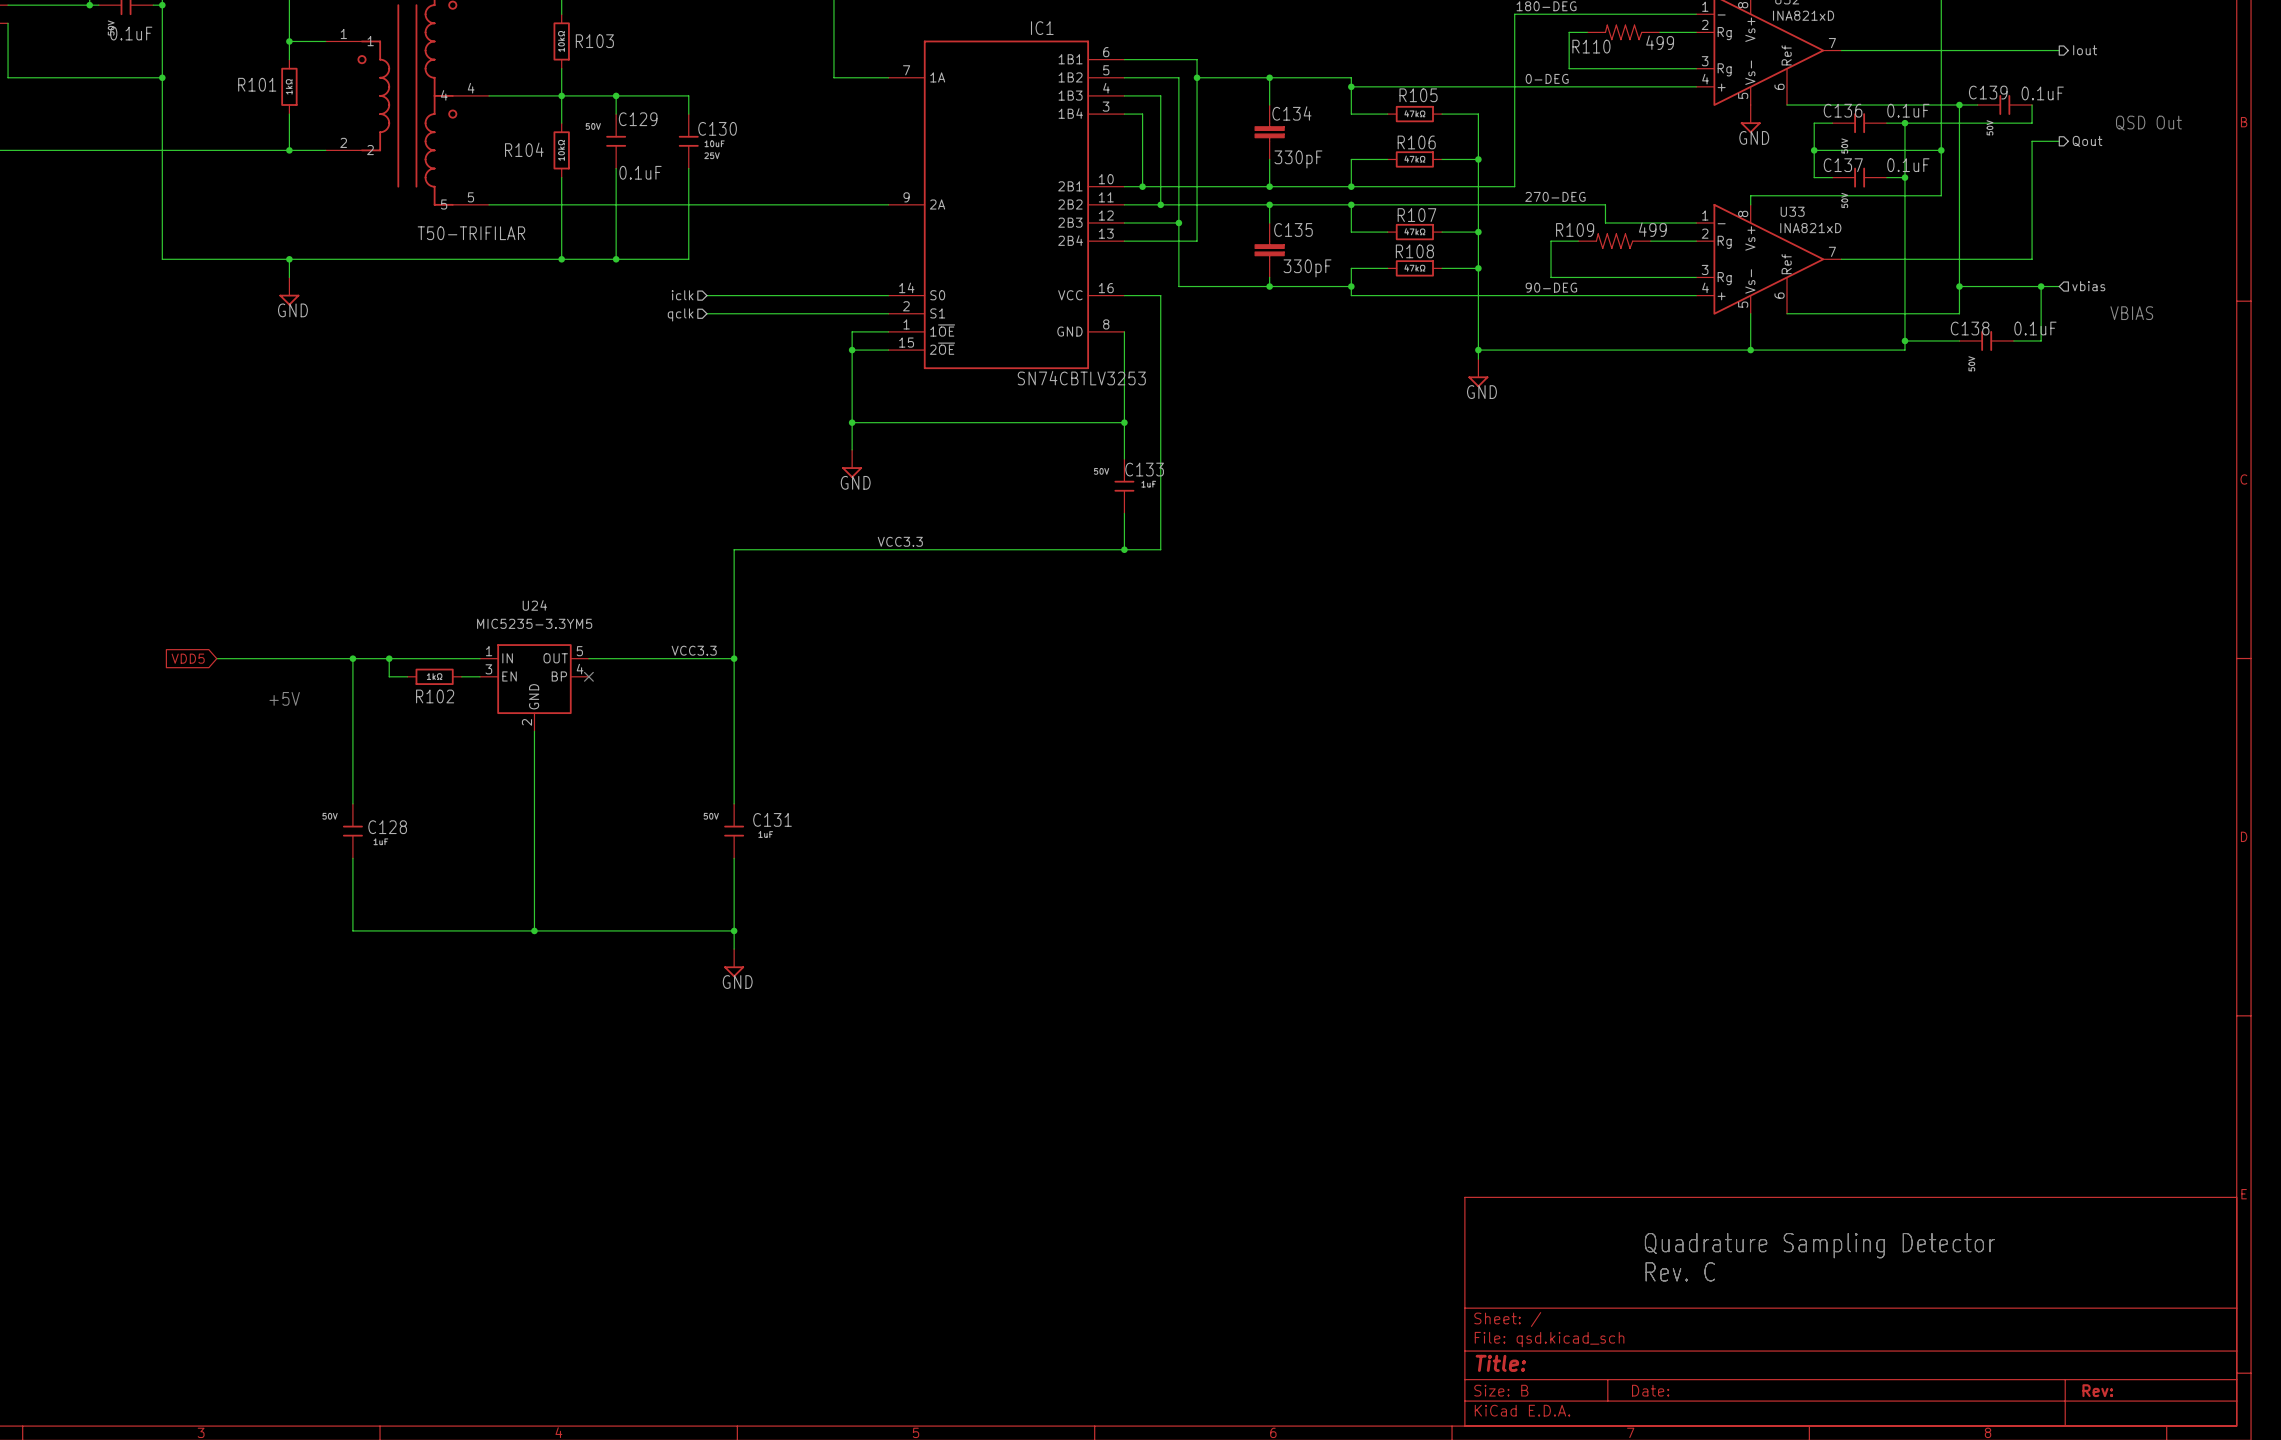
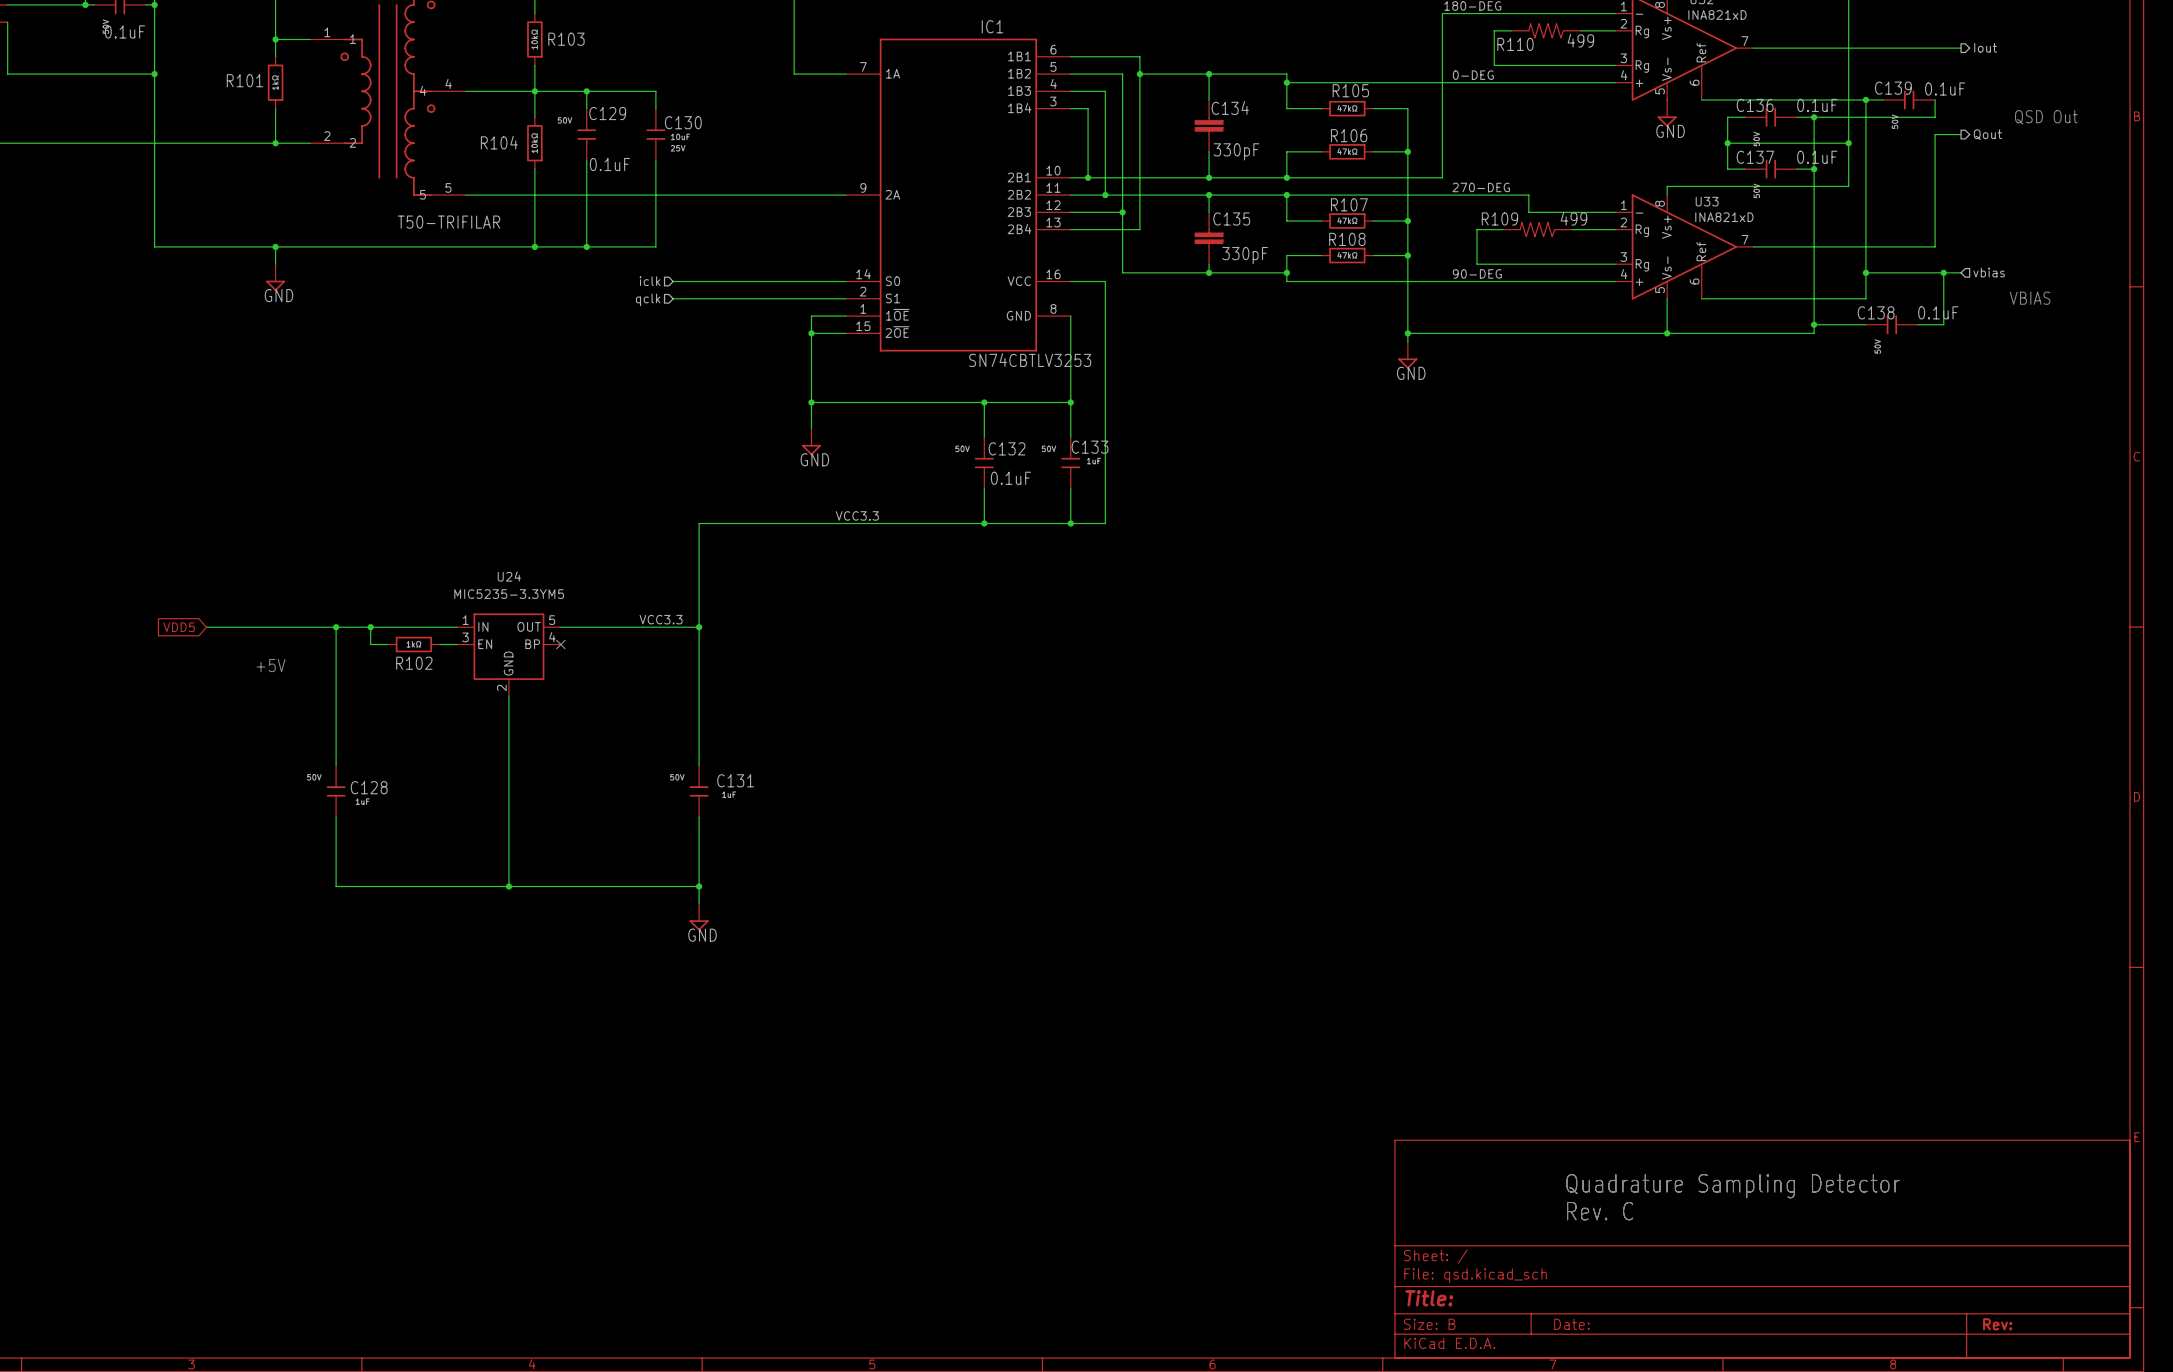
wire: none -> (984, 402) (984, 437)
junction: none -> (984, 402)
C132: none -> 0.1uF (984, 463)
wire: none -> (984, 488) (984, 523)
junction: none -> (984, 523)

